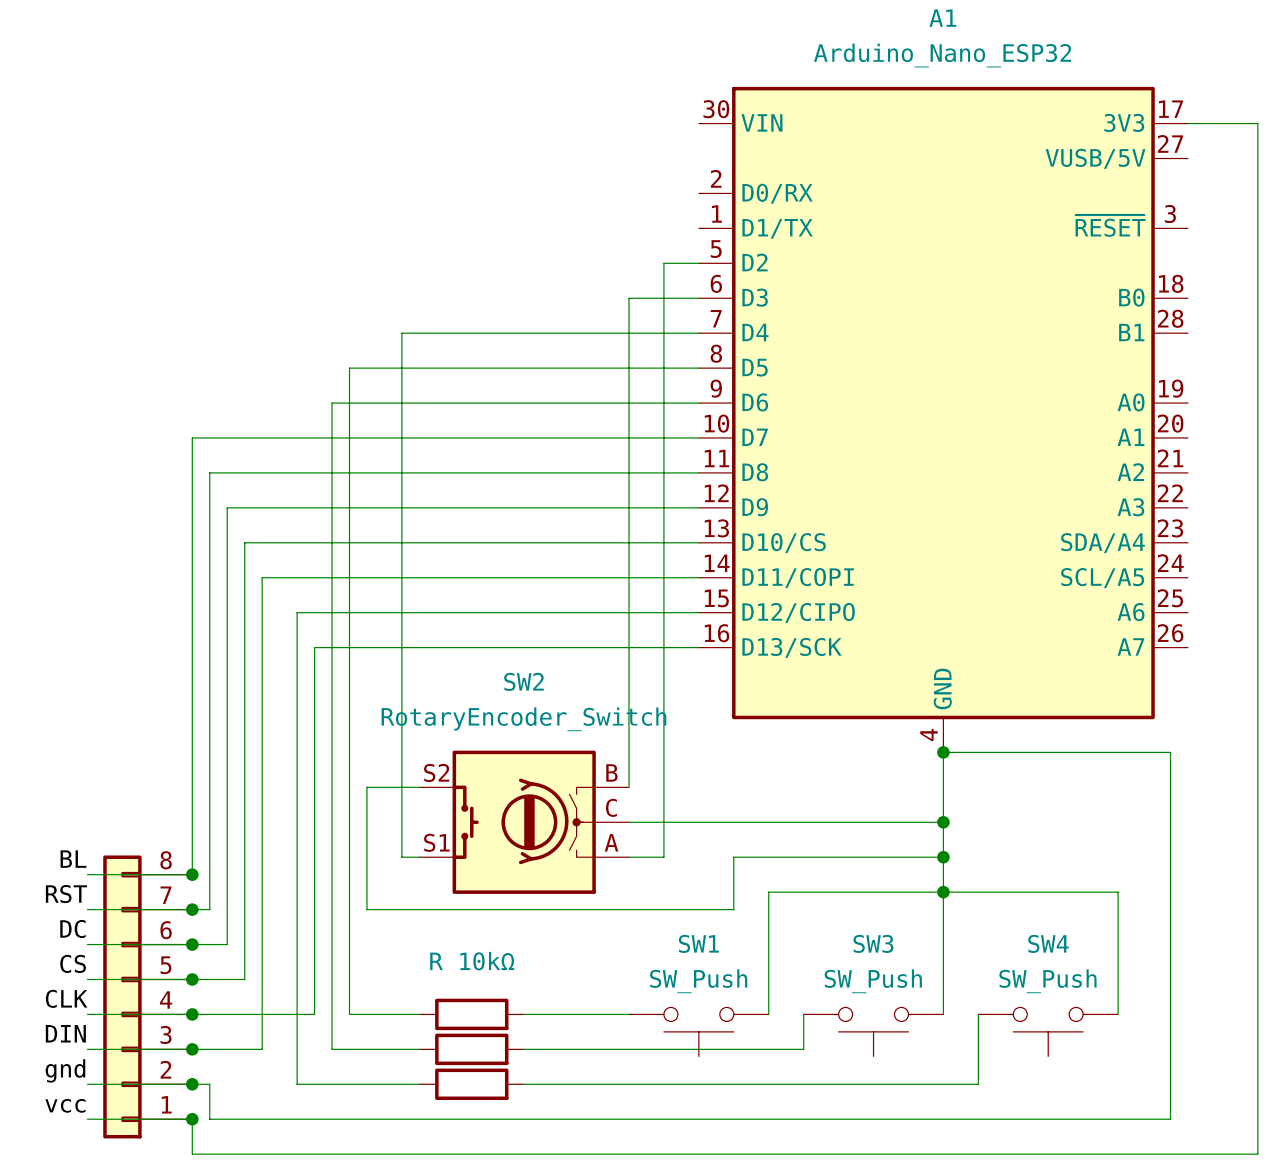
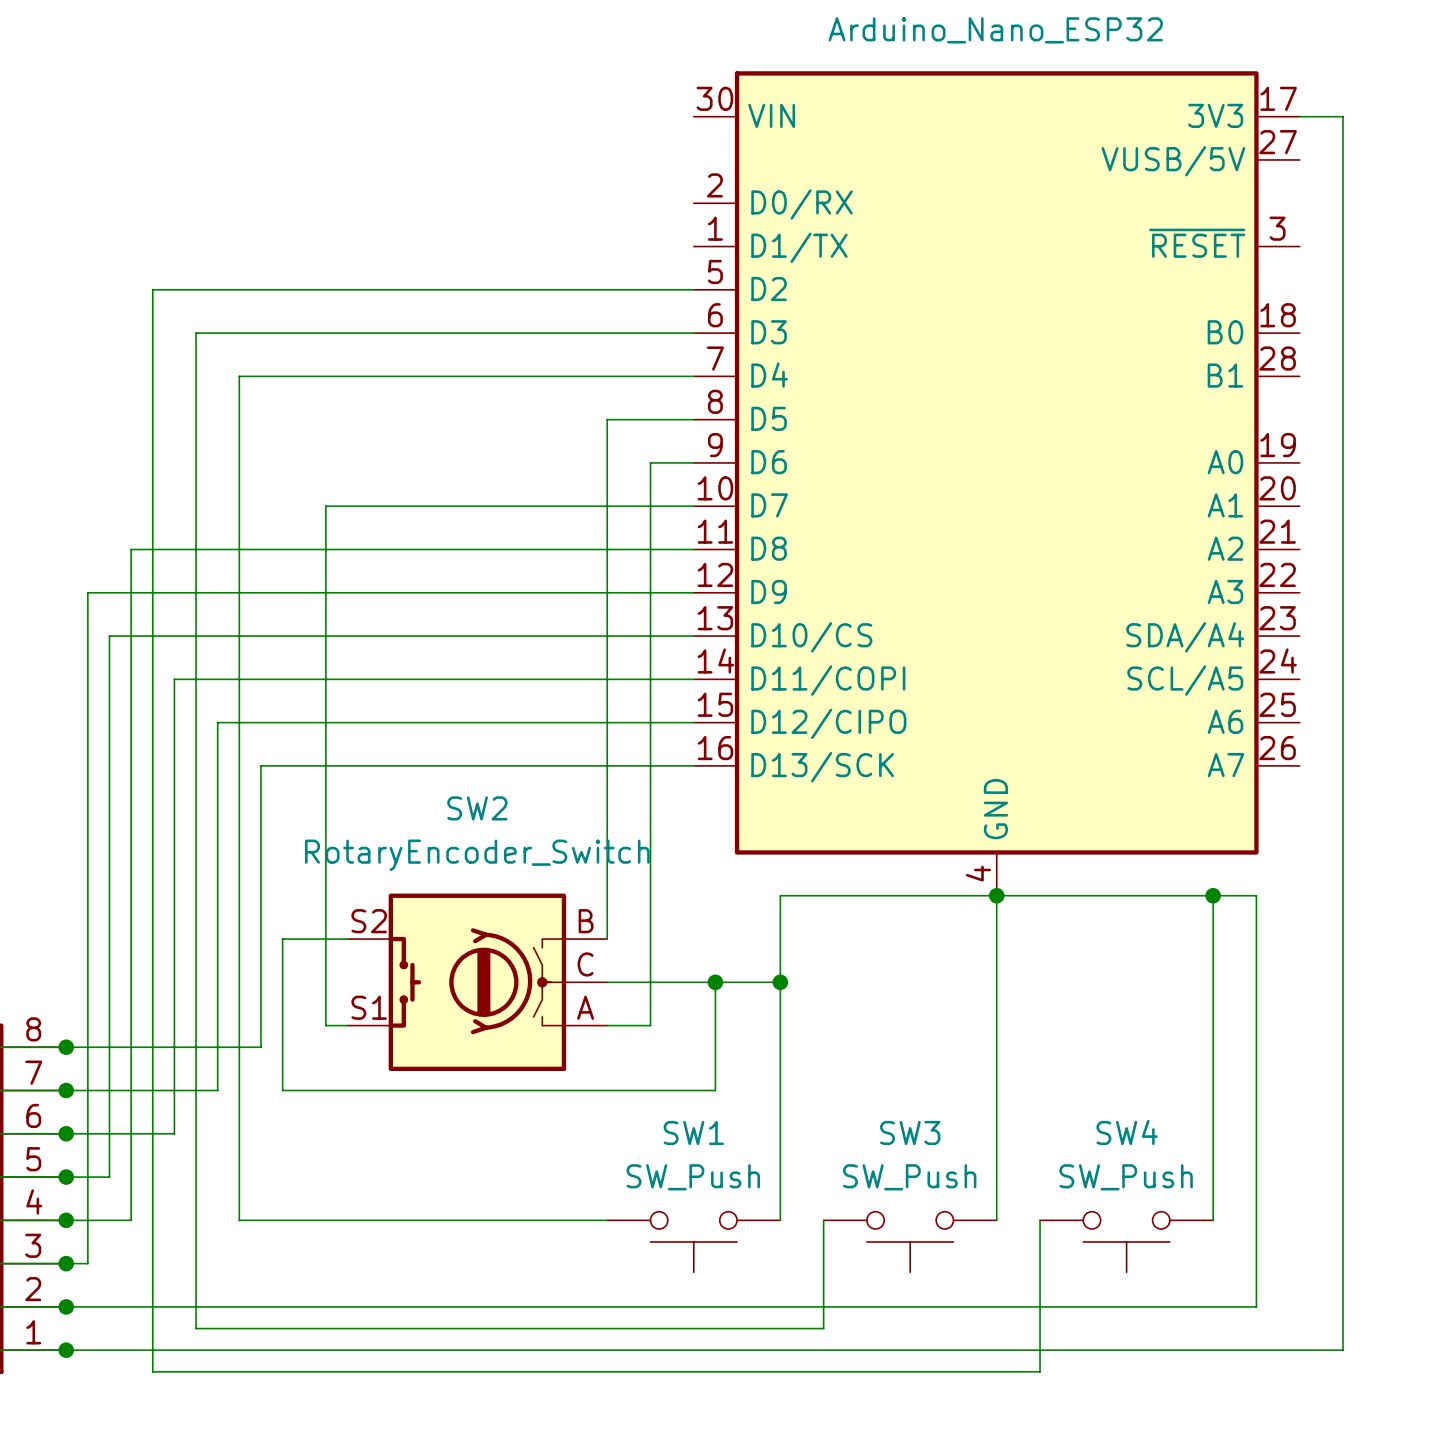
wire: (1222, 123) (1257, 123) (1257, 1154) (192, 1154) (192, 1119) -> none
wire: (663, 263) (663, 403) (332, 403) -> (650, 289) (152, 289) (152, 679)
wire: (628, 298) (628, 368) (349, 368) (349, 647) (314, 647) -> (607, 333) (196, 333) (196, 722)
wire: (401, 333) (401, 437) (192, 437) (192, 874) -> (325, 376) (239, 376) (239, 462)
wire: (244, 472) (209, 472) (209, 507) -> (131, 549) (131, 636) (109, 636)
wire: (227, 507) (227, 542) -> (109, 592) (87, 592)
wire: (262, 577) (279, 577) -> (109, 1177) (109, 1133) (174, 1133) (174, 679)
wire: (297, 612) (314, 612) -> (217, 765) (217, 722)
wire: none -> (1213, 895) (1213, 1068)
junction: none -> (1213, 895)
wire: (1153, 752) (1170, 752) (1170, 1119) -> (1342, 116) (1342, 1350) (1278, 1350)
junction: none -> (715, 982)
wire: (768, 822) (943, 822) -> none
junction: none -> (780, 982)
junction: (943, 822) -> none
wire: (943, 857) (733, 857) (733, 909) (716, 909) -> (715, 982) (715, 1090)
junction: (943, 857) -> none
wire: (349, 874) (349, 1014) -> (260, 1047) (66, 1047)
wire: (768, 892) (1118, 892) -> (780, 1068) (780, 895) (996, 895)
junction: (943, 892) -> none
wire: (314, 909) (314, 1014) (244, 1014) -> (217, 1090) (87, 1090) (87, 1263)
wire: (227, 979) (244, 979) -> (131, 1220) (131, 1177)
wire: (332, 1014) (332, 1049) (419, 1049) -> (239, 1220) (260, 1220)
wire: none -> (347, 1220) (477, 1220)
part: R 10kΩ (471, 1014) -> none
wire: (209, 1049) (262, 1049) -> (1256, 895) (1256, 1306) (1040, 1306) (1040, 1371) (152, 1371) (152, 1263)
part: (471, 1049) -> none
wire: (524, 1049) (803, 1049) -> (87, 1306) (196, 1306) (196, 1328) (823, 1328) (823, 1263)
wire: (209, 1084) (209, 1119) -> (66, 1350) (87, 1350)
wire: none -> (347, 1306) (477, 1306)
part: (471, 1084) -> none

